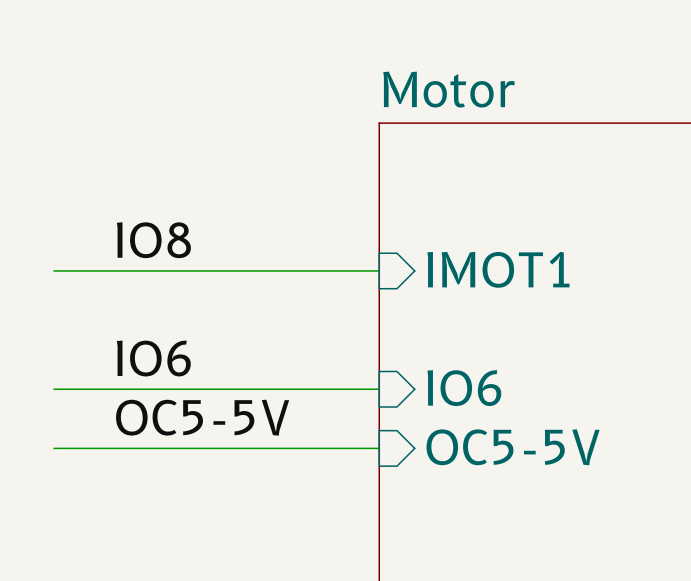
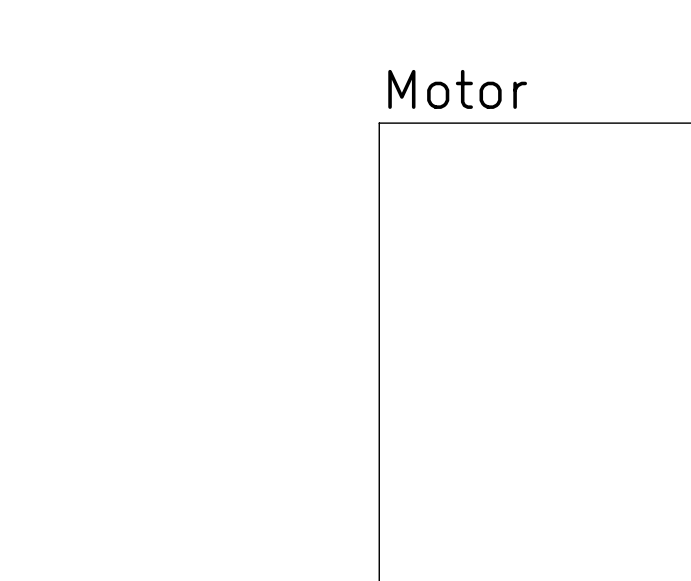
label: IO8 (153, 240) -> none
sheet pin: IMOT1 (498, 269) -> none
wire: (53, 270) (379, 270) -> none
label: IO6 (153, 358) -> none
sheet pin: IO6 (464, 388) -> none
wire: (53, 389) (379, 389) -> none
label: OC5-5V (202, 417) -> none
sheet pin: OC5-5V (513, 447) -> none
wire: (53, 448) (379, 448) -> none

